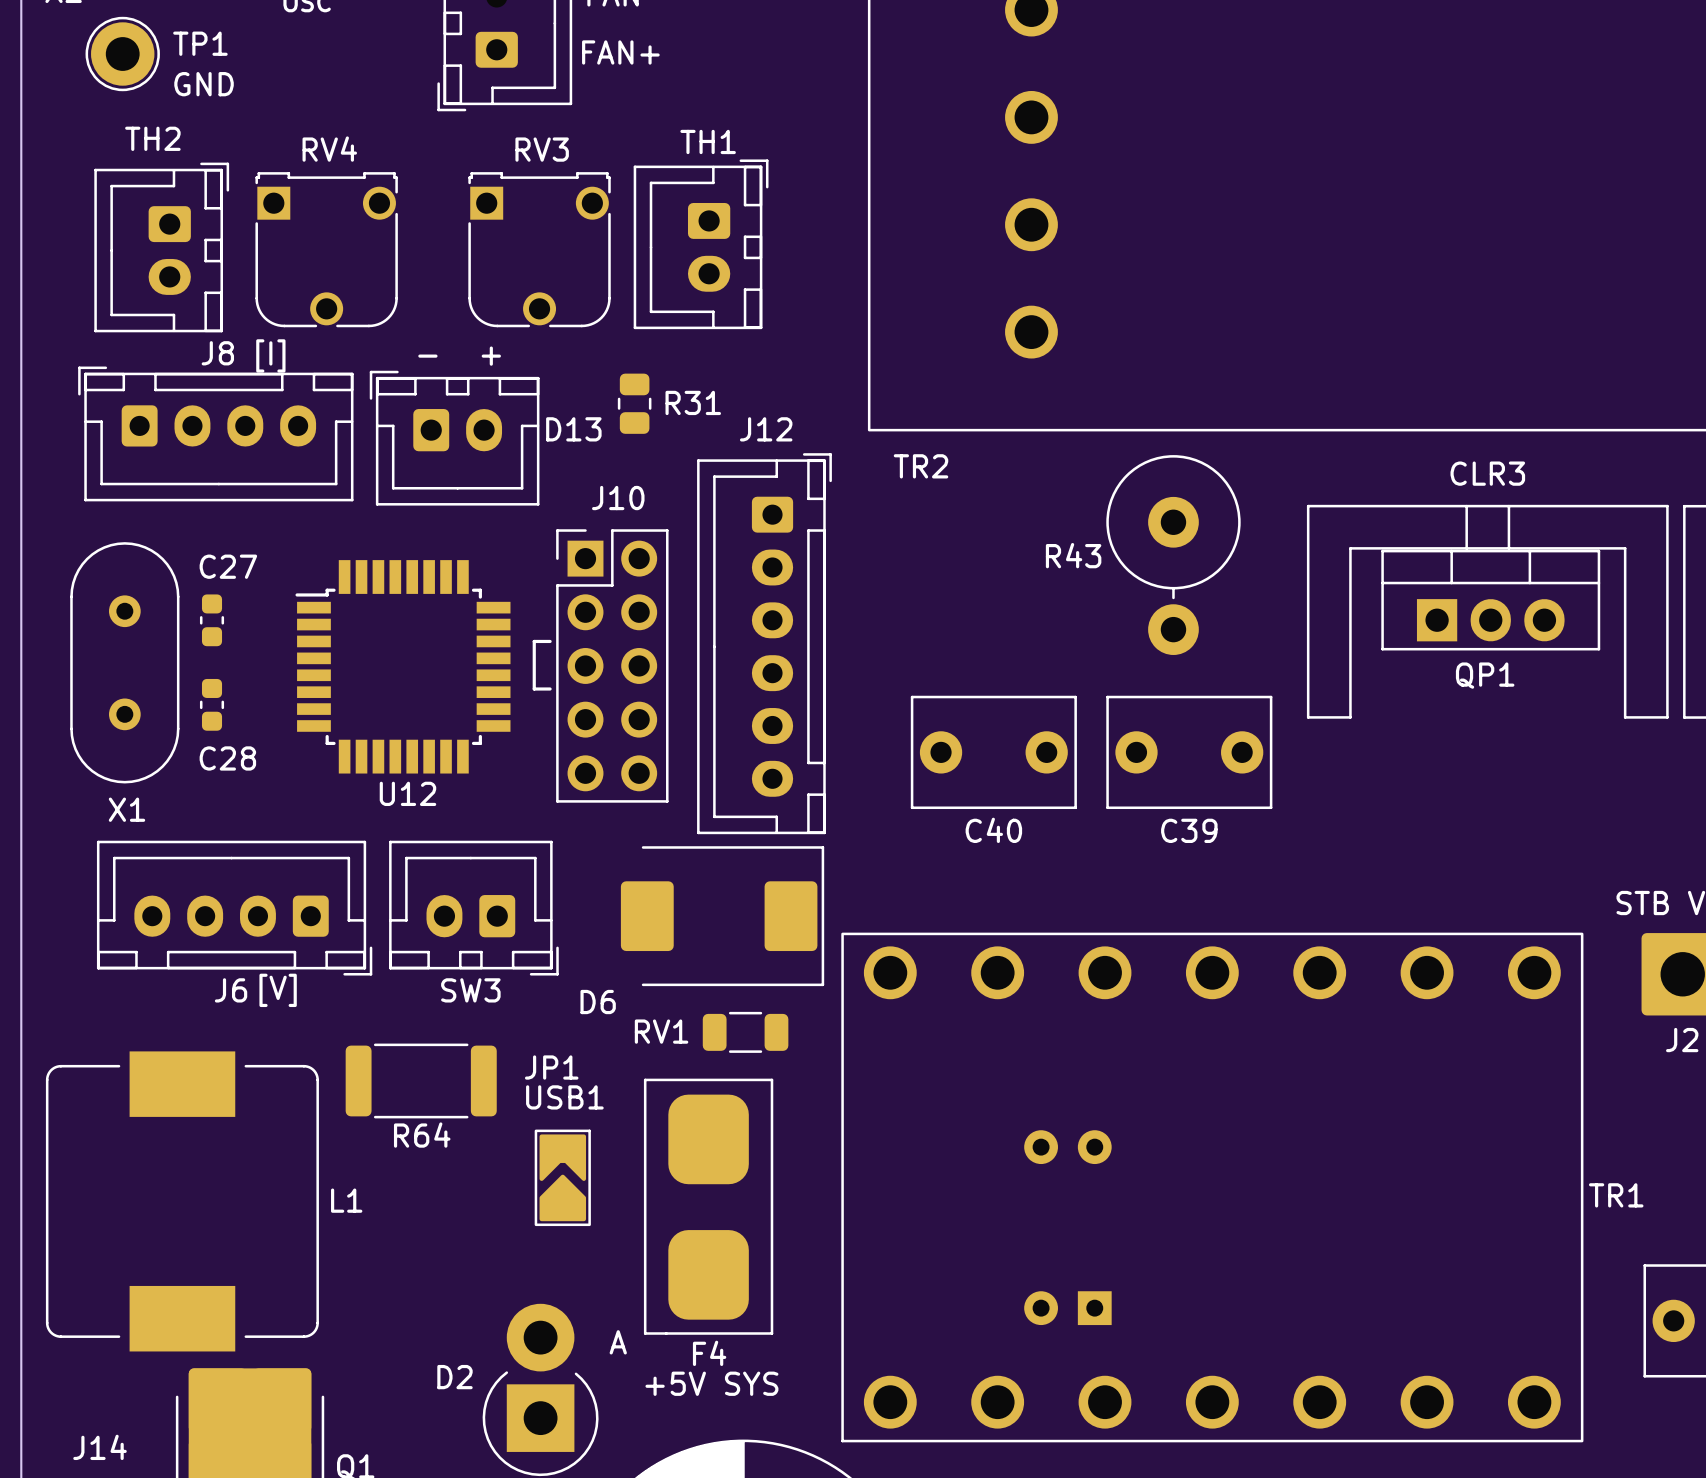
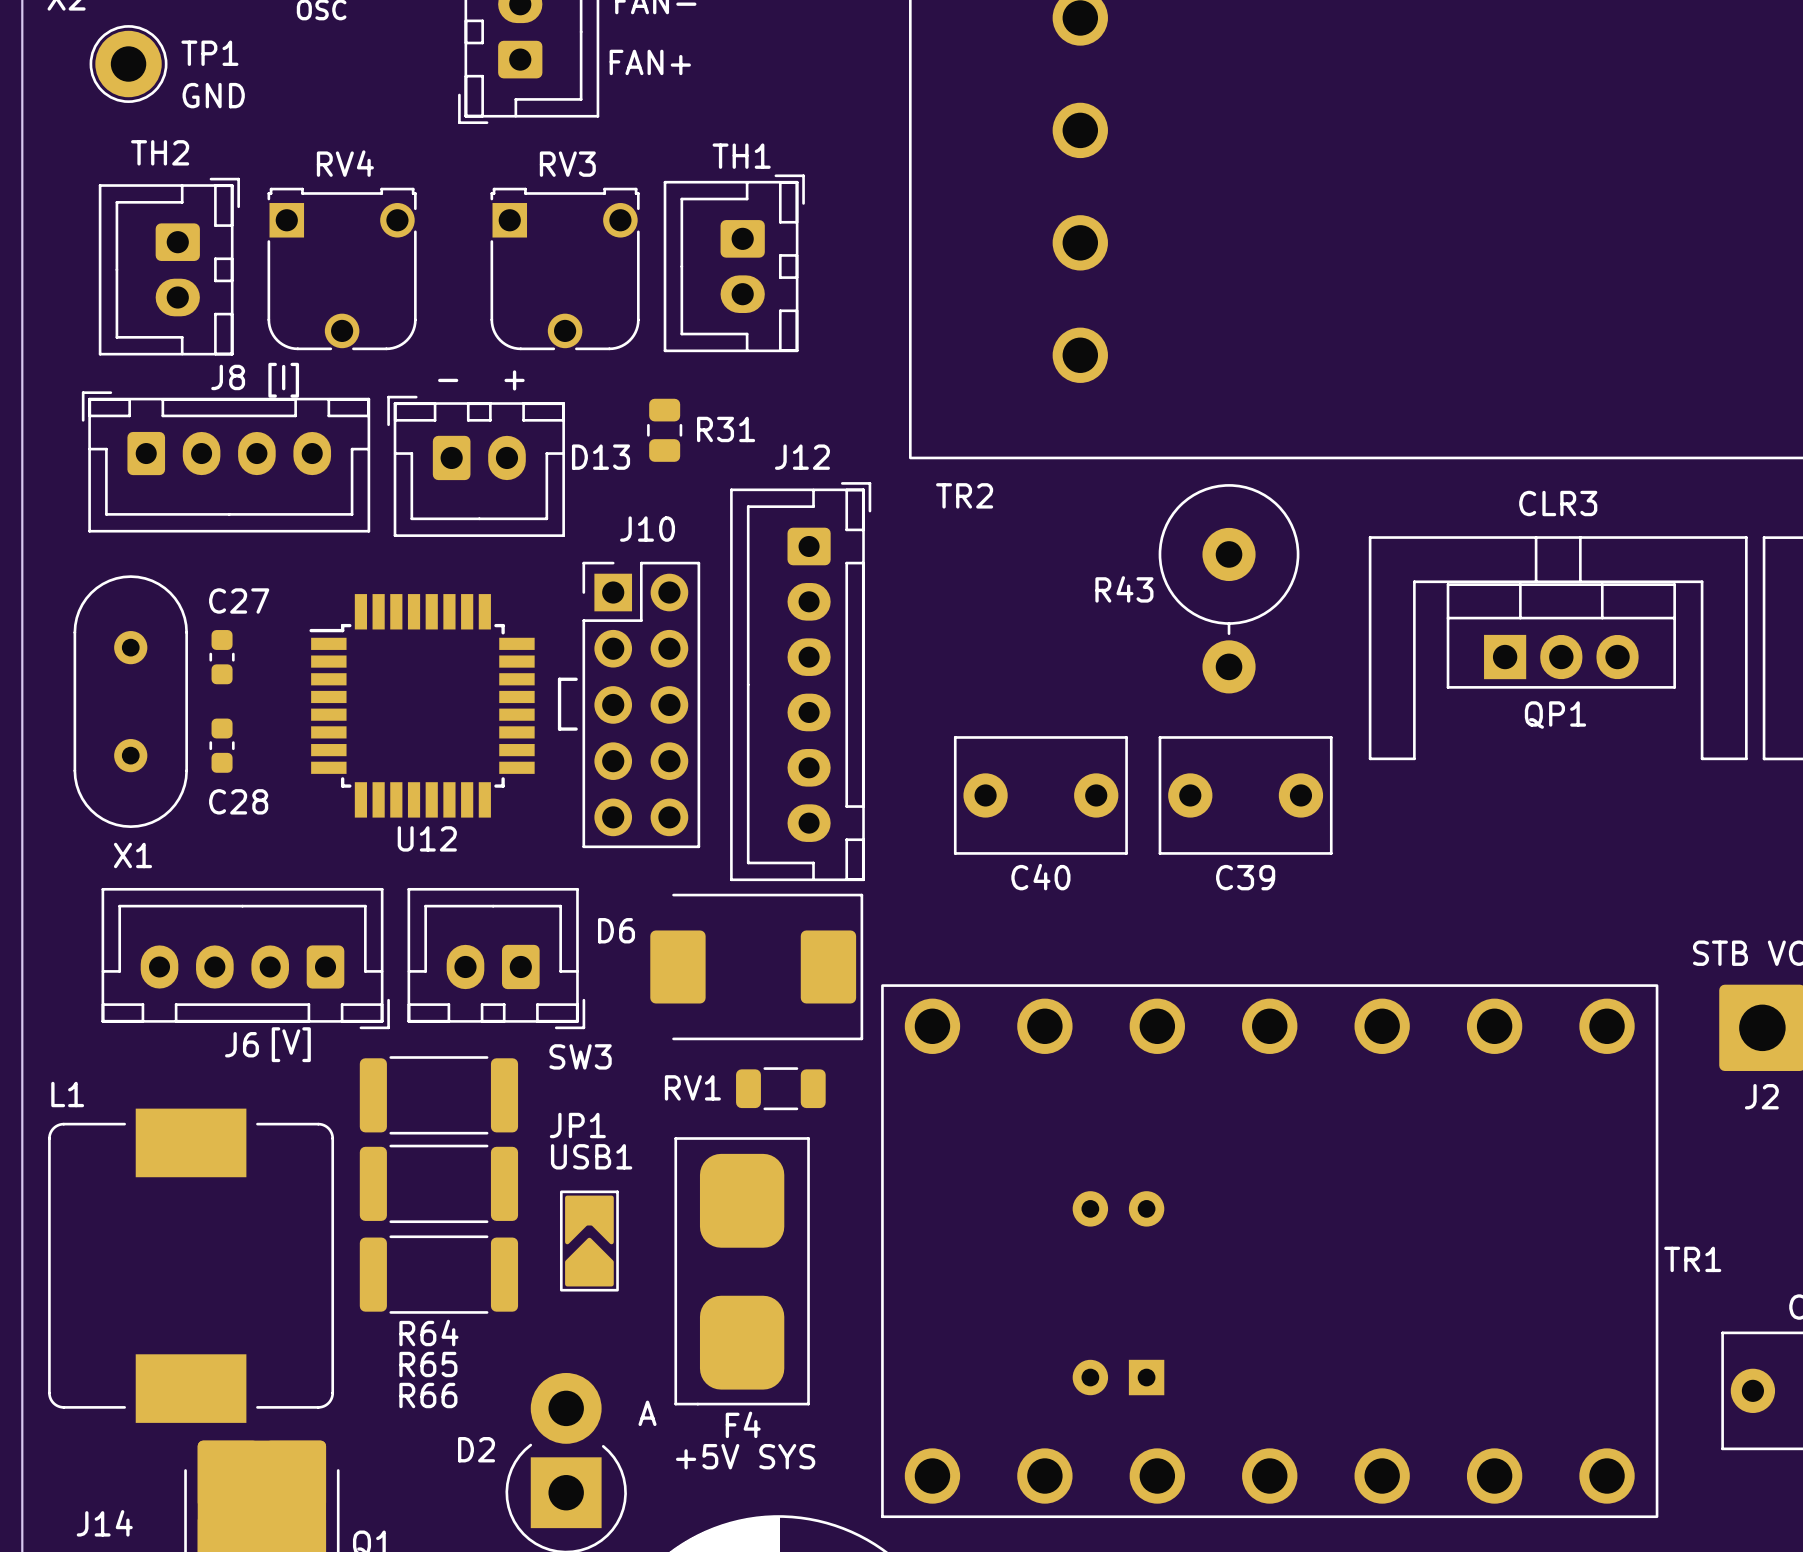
SW3 name position: SW3 (470, 990) -> SW3 (580, 1056)
D6 name position: D6 (598, 1002) -> D6 (616, 930)
R64 position: (421, 1080) -> (438, 1095)
R65: none -> (438, 1183)
R64 name position: R64 (422, 1135) -> R64 (428, 1333)
L1 name position: L1 (346, 1200) -> L1 (67, 1094)
R66: none -> (438, 1274)

